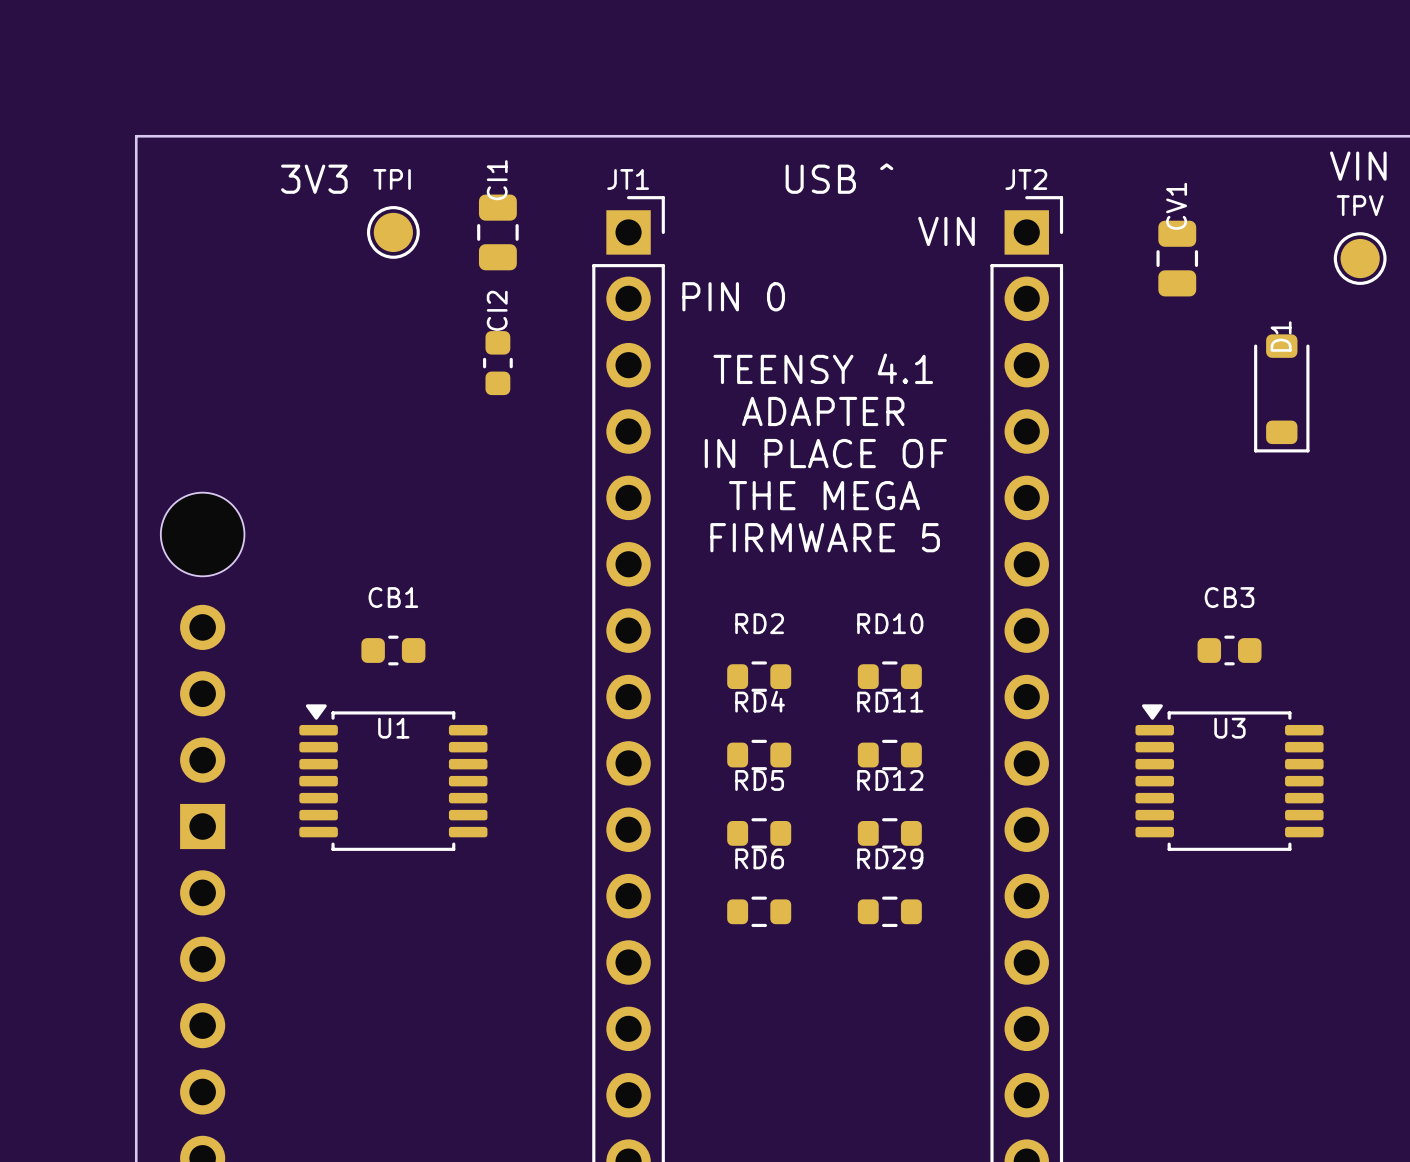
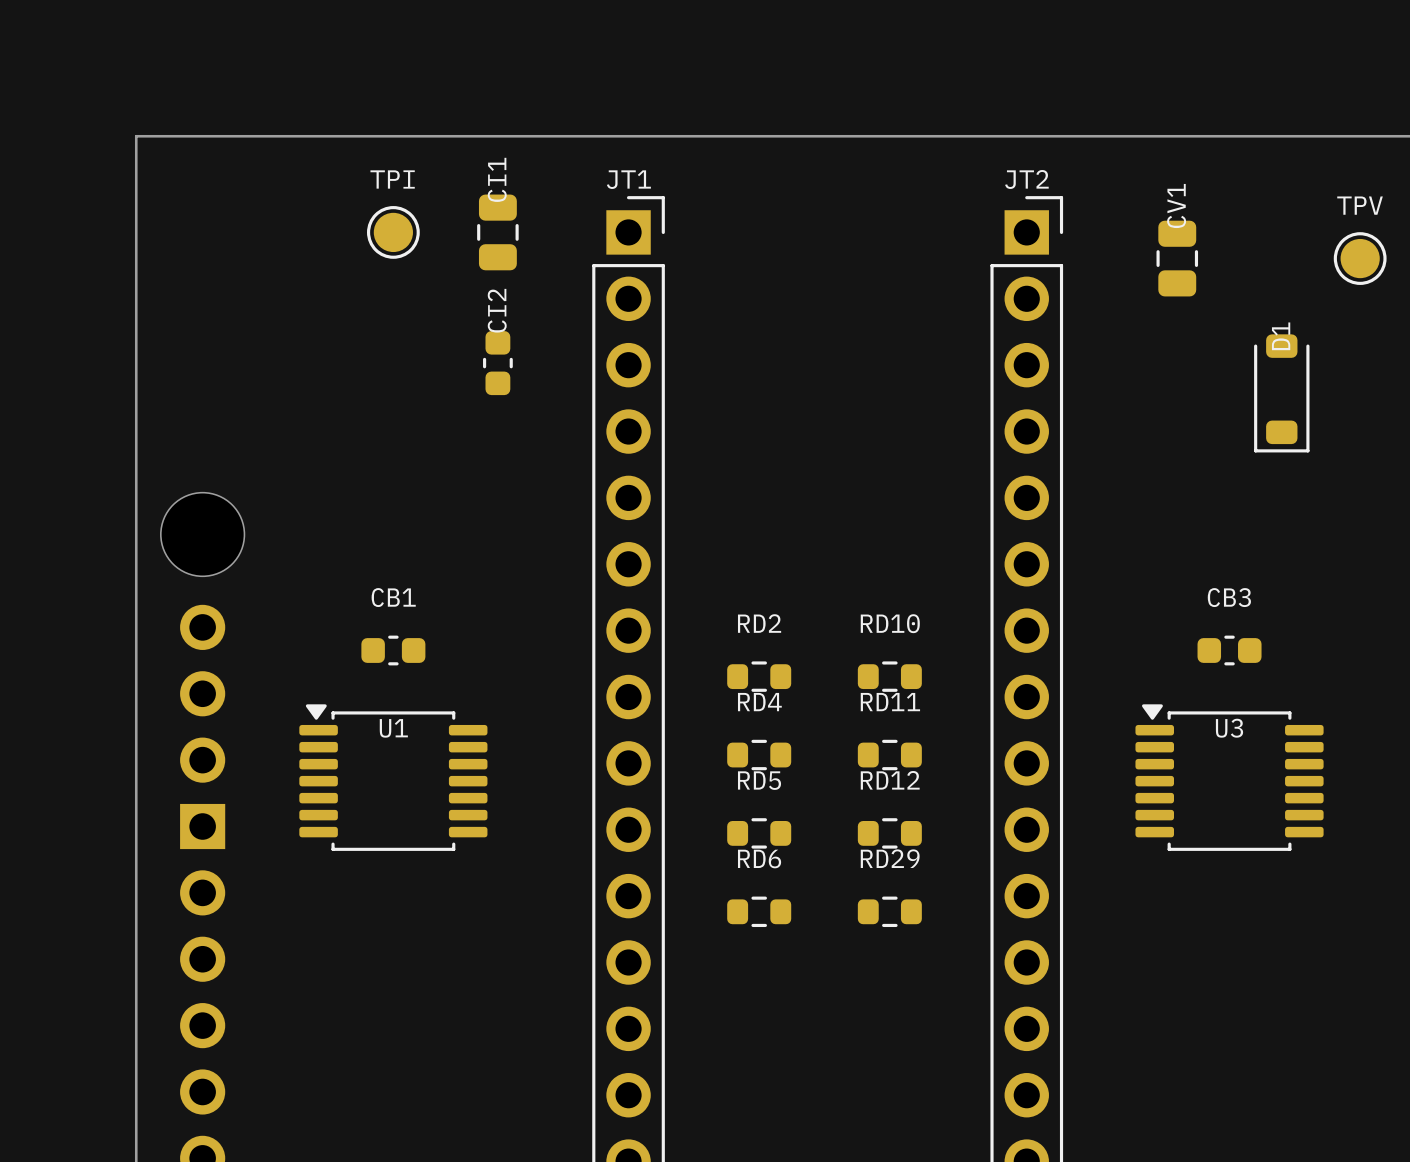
text: VIN (1358, 166) -> none
text: USB ^ (839, 178) -> none
text: 3V3 (314, 179) -> none
text: VIN (946, 231) -> none
text: PIN 0 (733, 296) -> none
text: TEENSY 4.1 (823, 368) -> none
text: ADAPTER (823, 411) -> none
text: IN PLACE OF (825, 453) -> none
text: THE MEGA (824, 495) -> none
text: FIRMWARE 5 (825, 537) -> none

